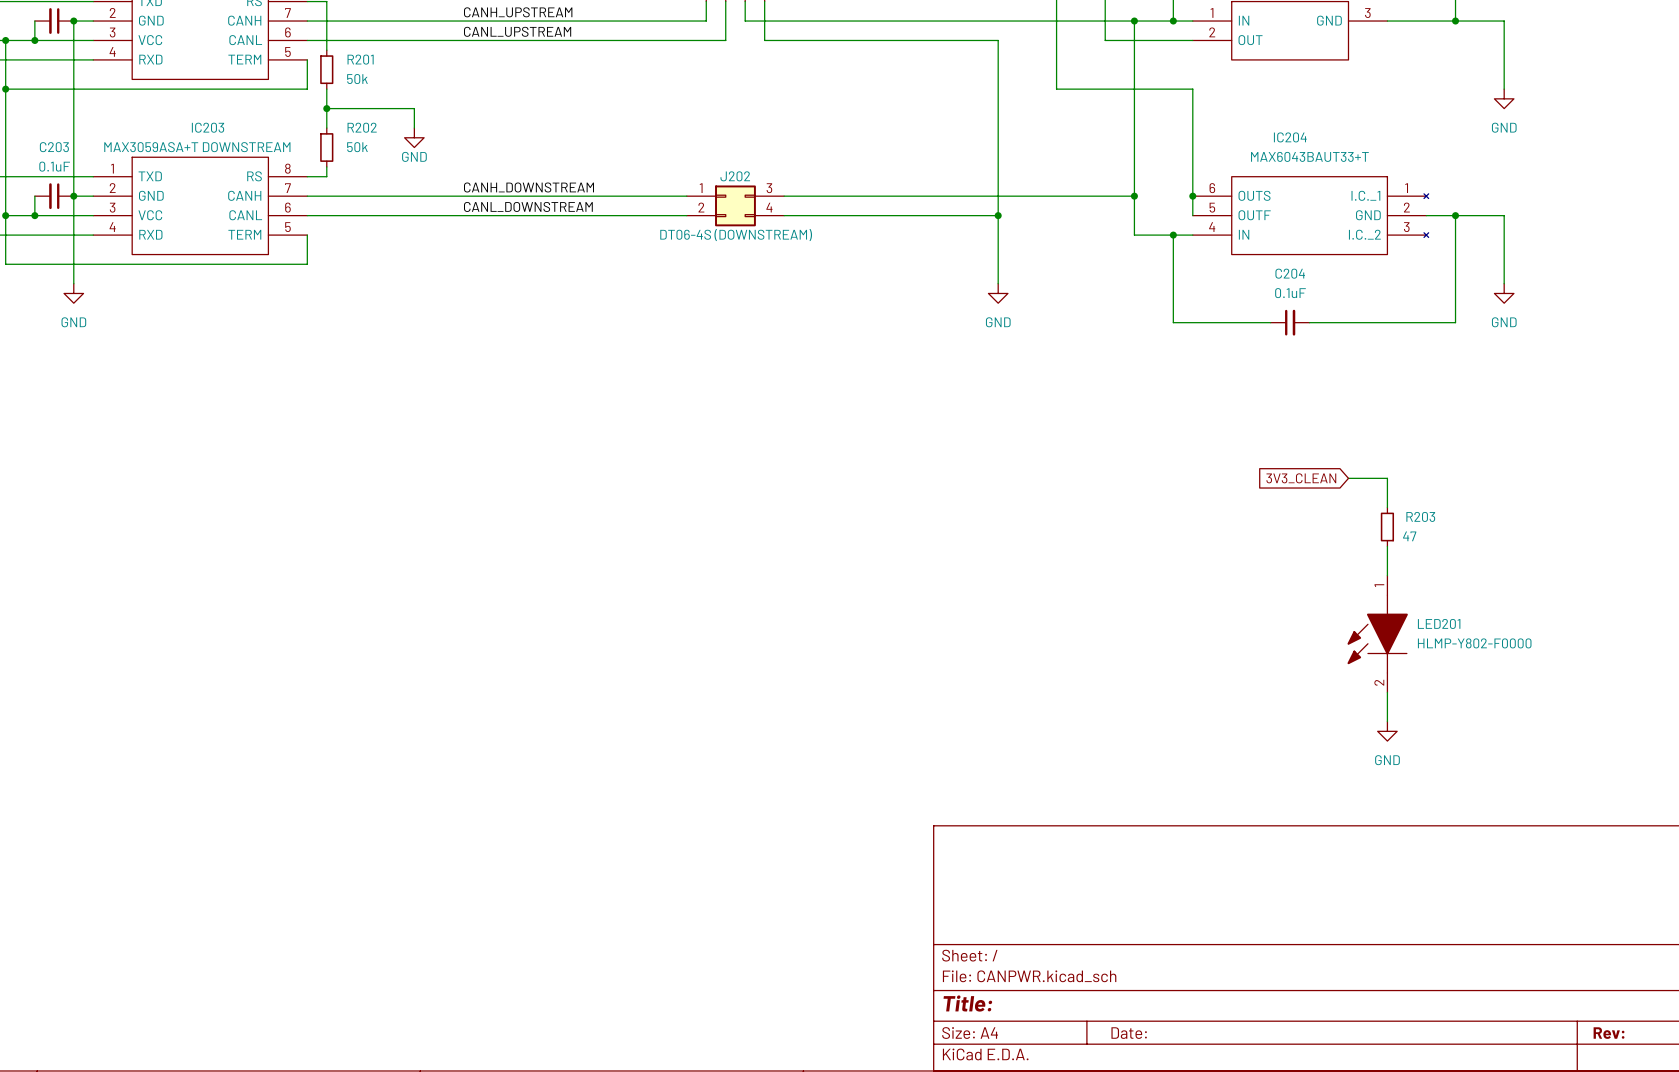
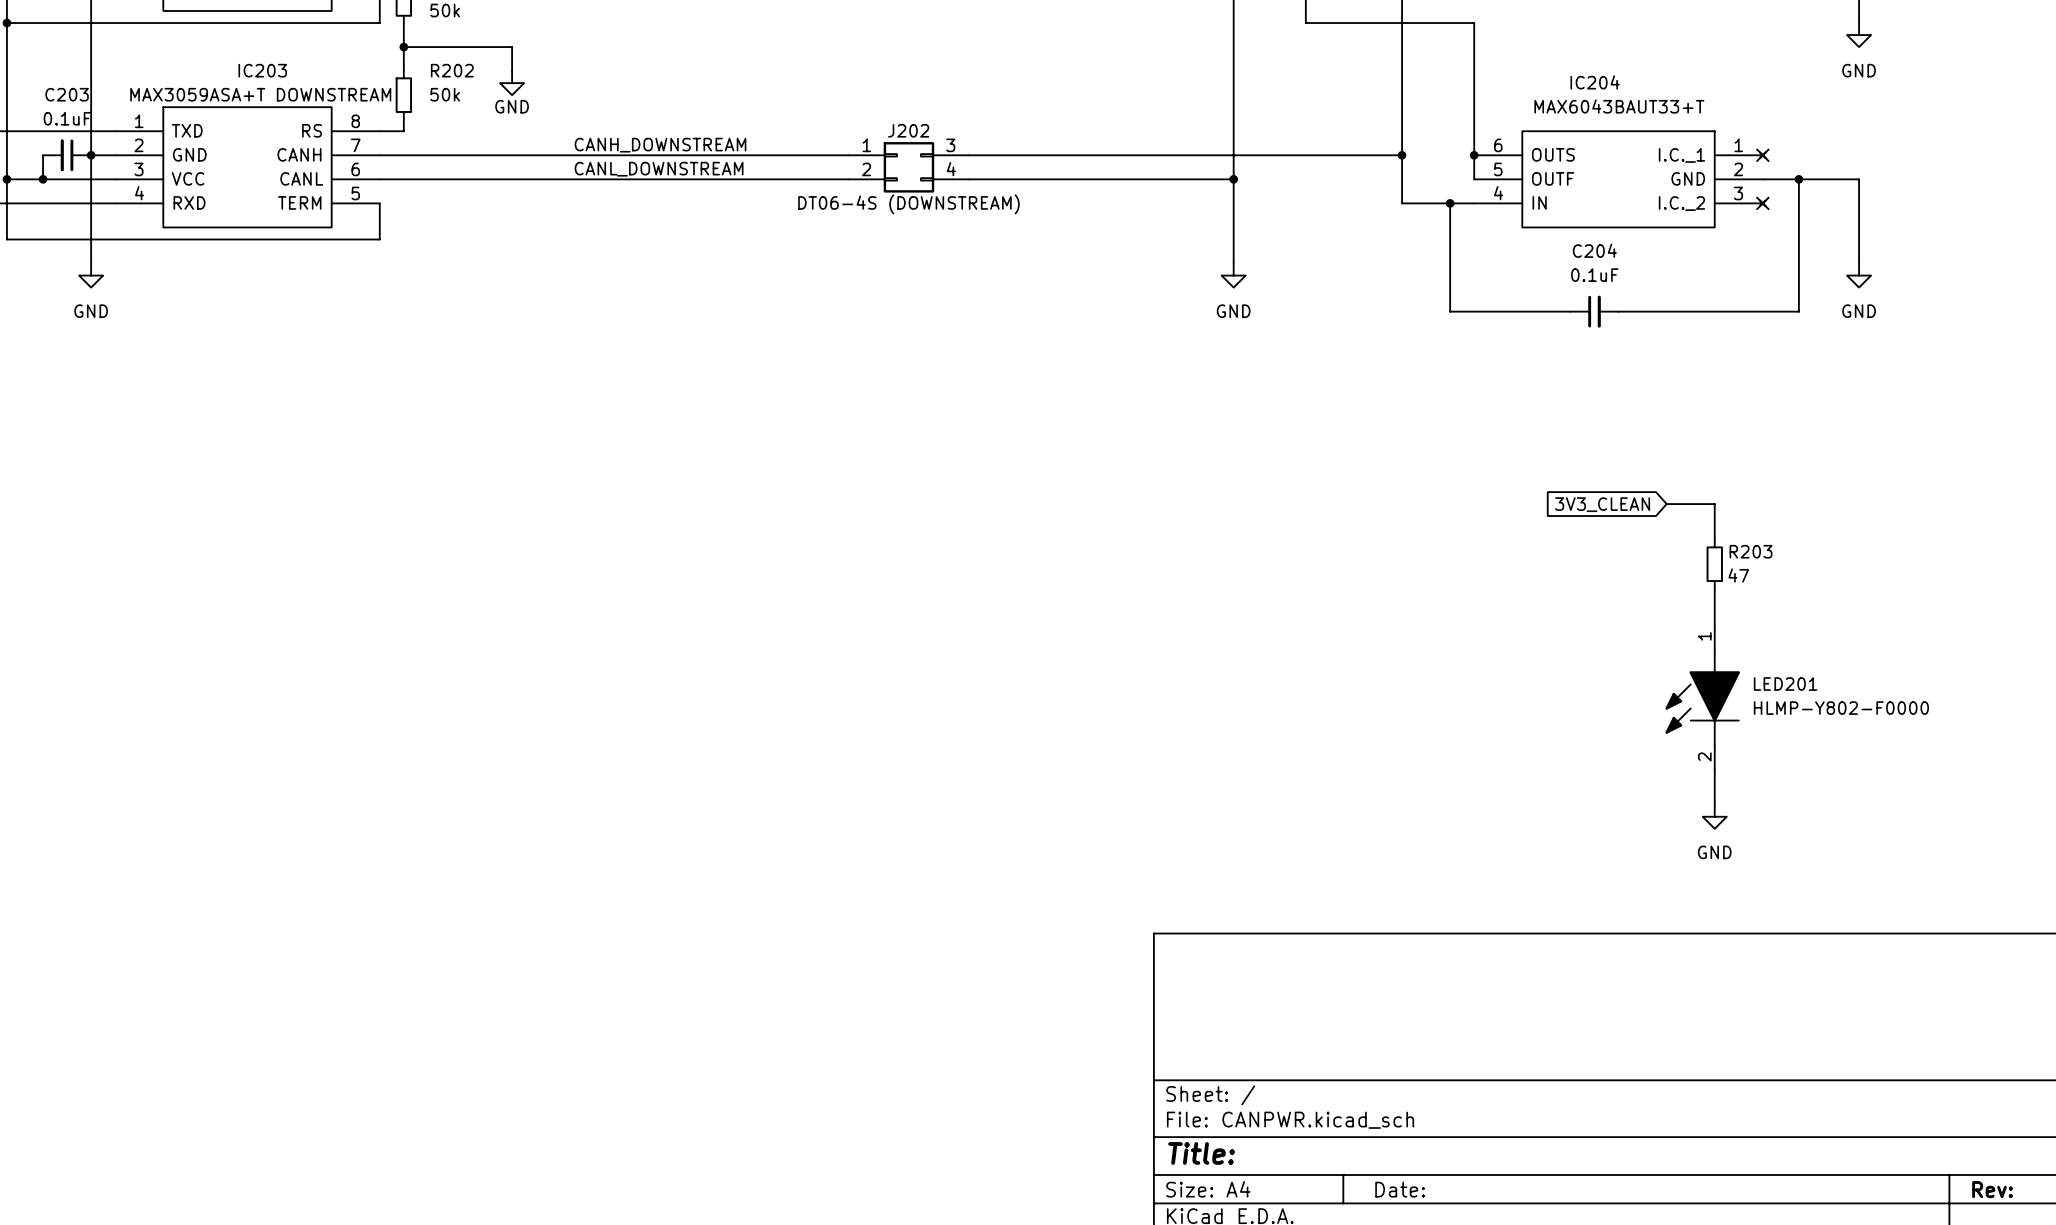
no-connect mark: none -> (1762, 155)
no-connect mark: none -> (1762, 203)

